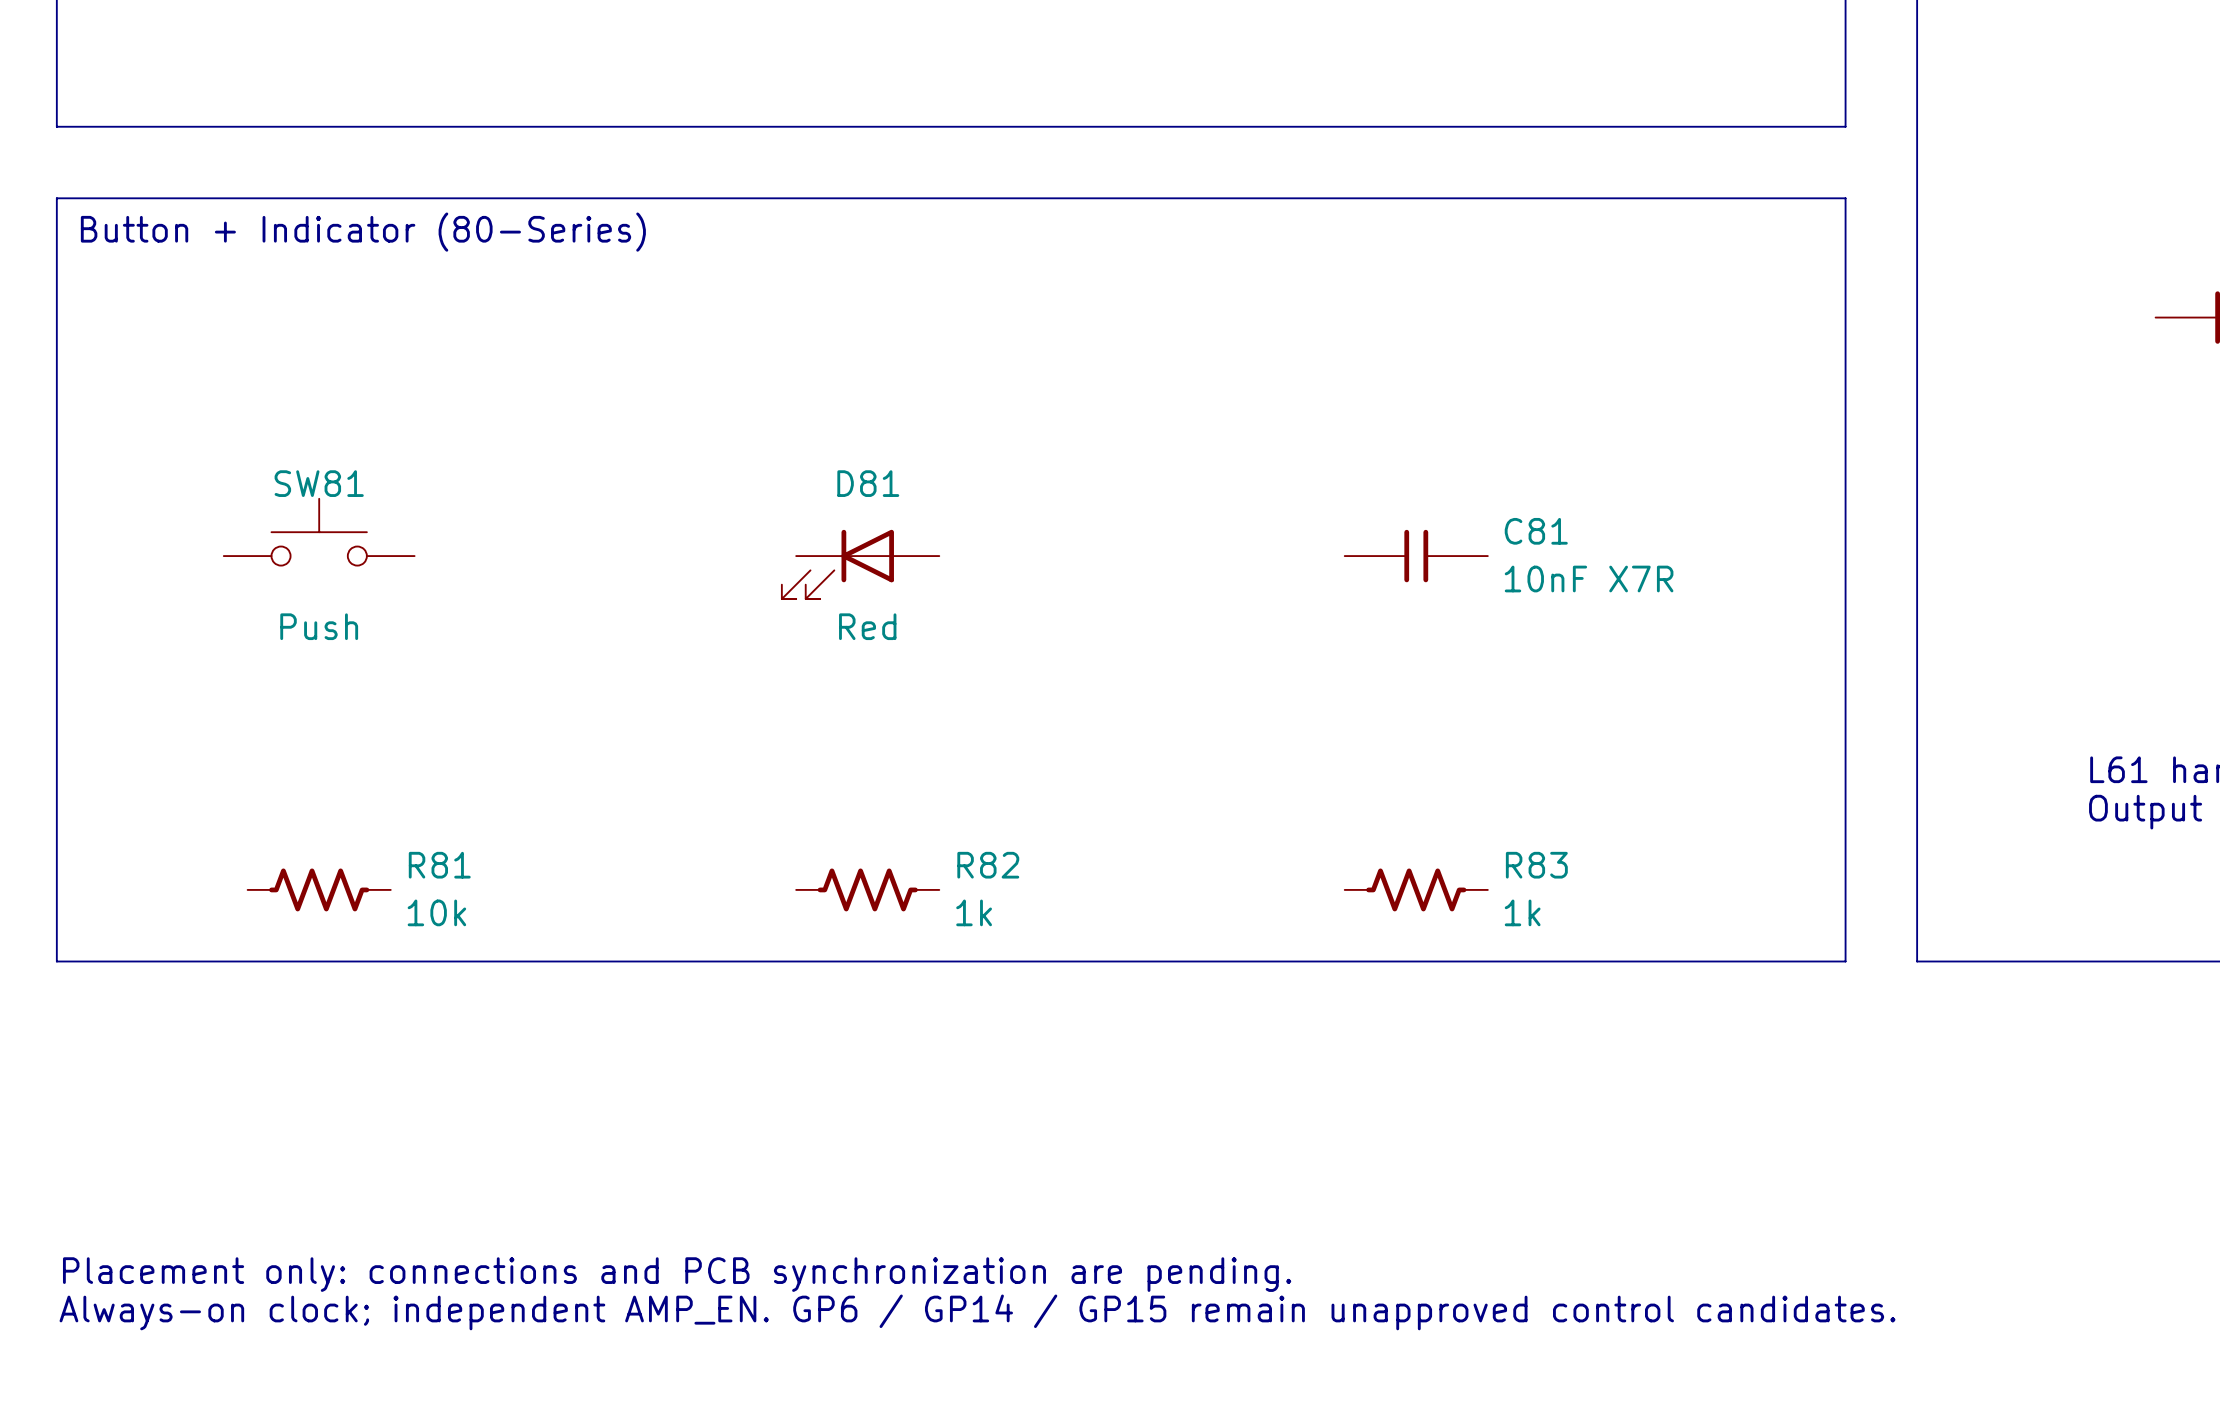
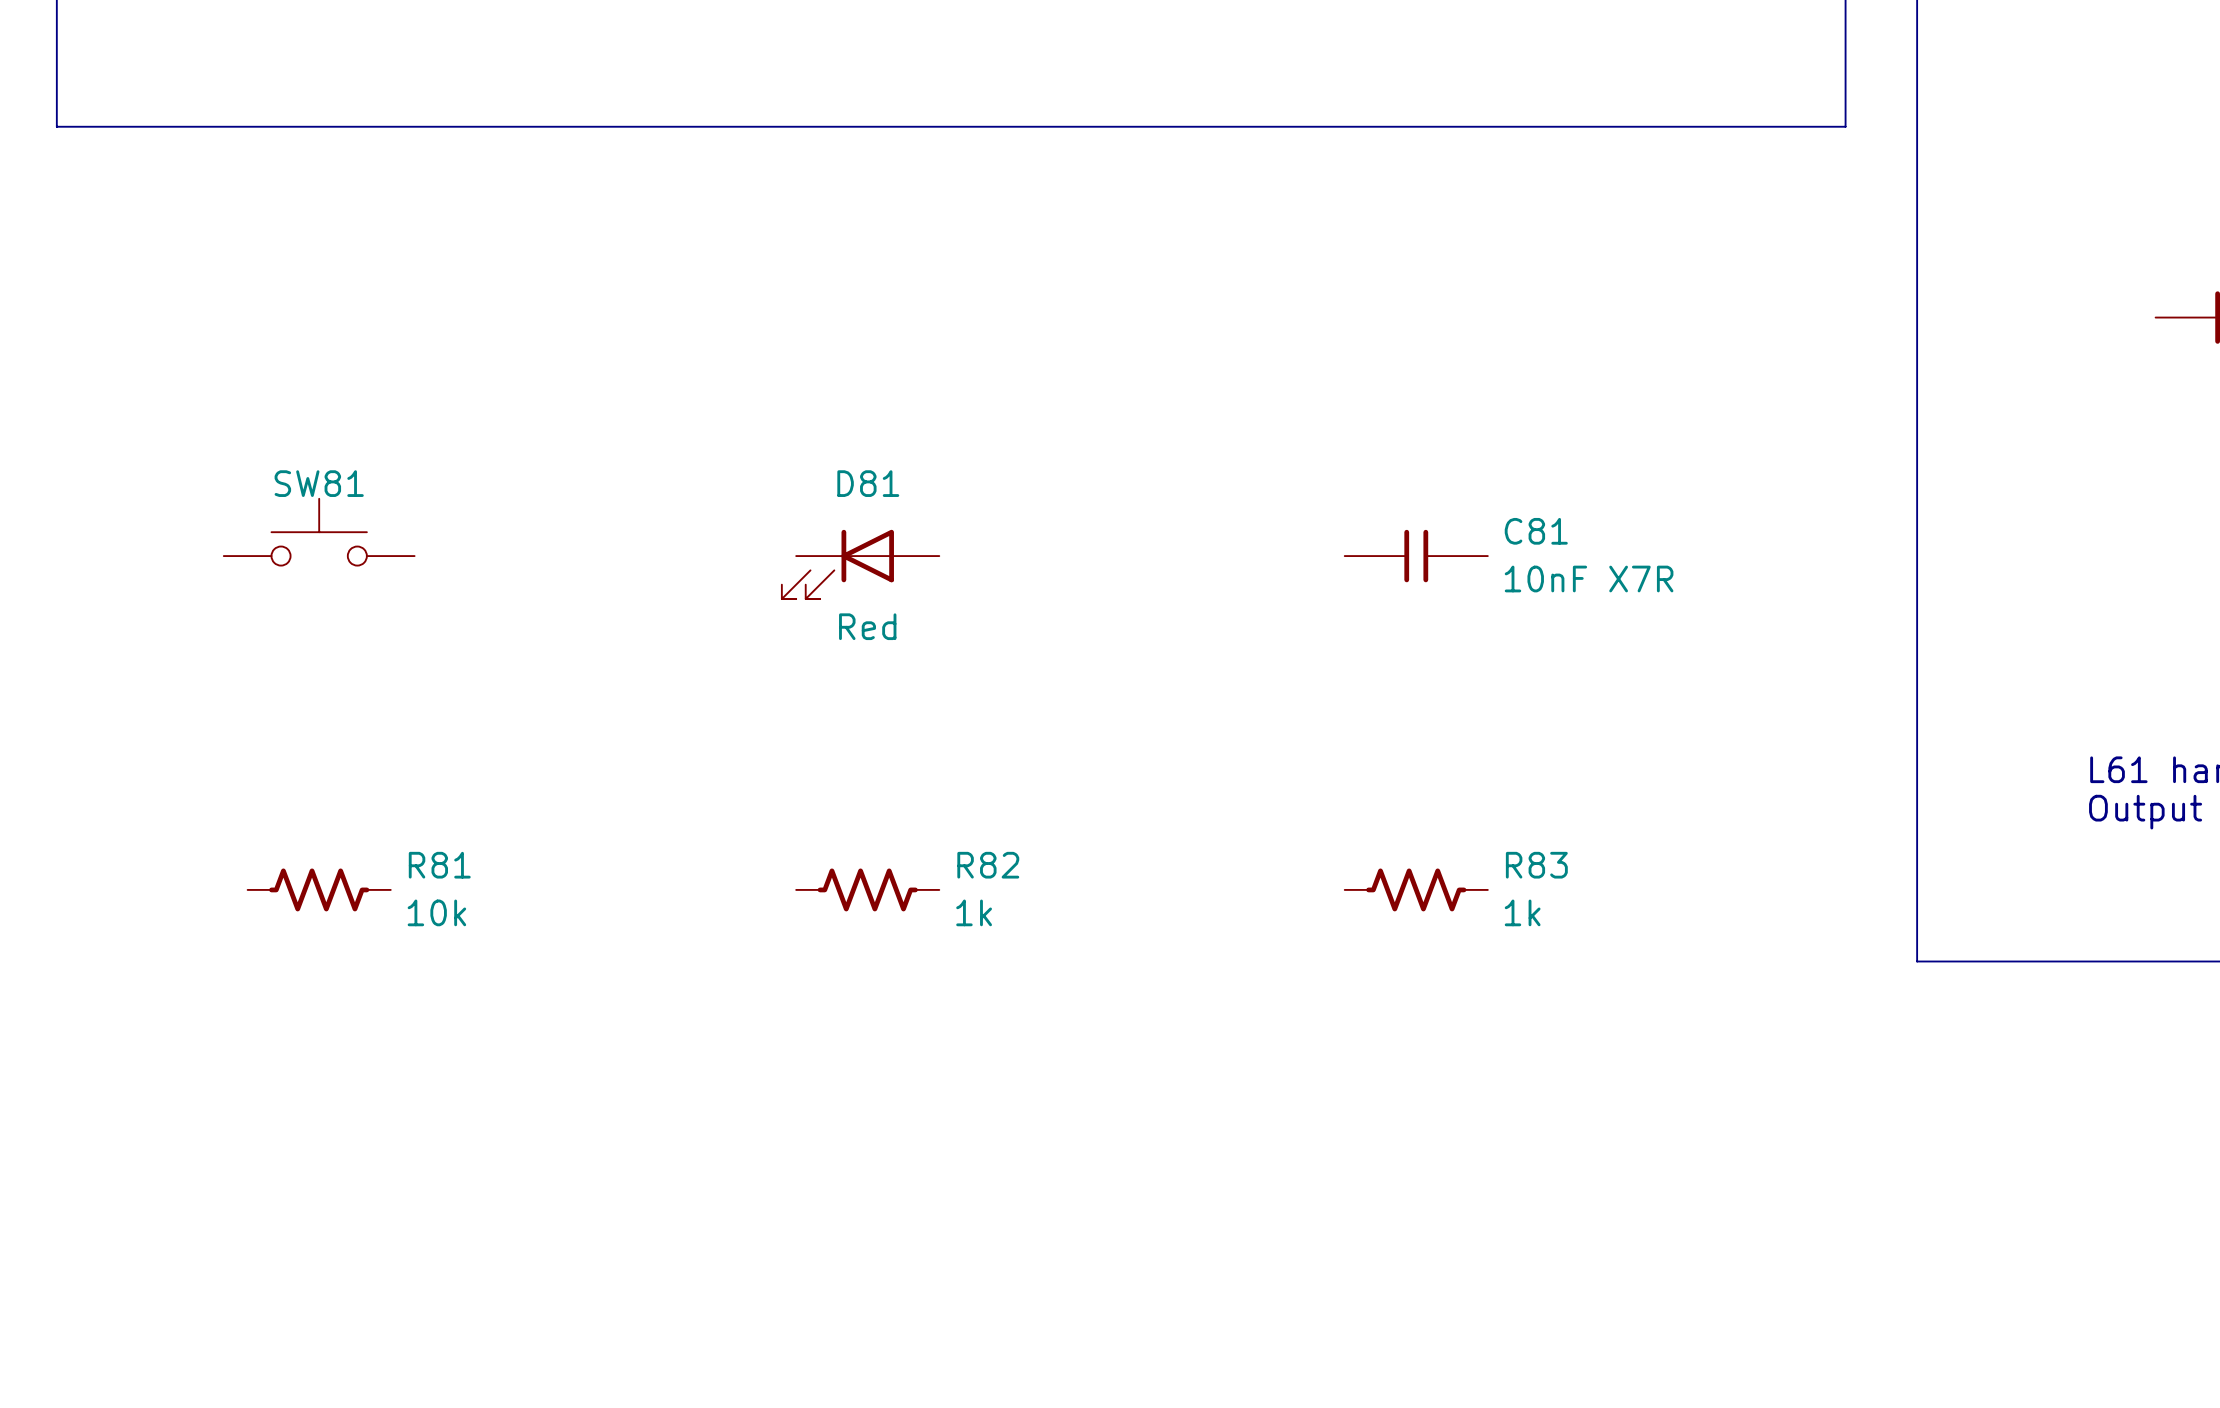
line: (56, 198) (56, 961) (1845, 961) (1845, 198) (56, 198) -> none
text: Button + Indicator (80-Series) (363, 232) -> none
SW81 value: Push (319, 626) -> none
text: Placement only: connections and PCB synchronization are pending. (677, 1274) -> none
text: Always-on clock; independent AMP_EN. GP6 / GP14 / GP15 remain unapproved control candidates. (977, 1312) -> none

